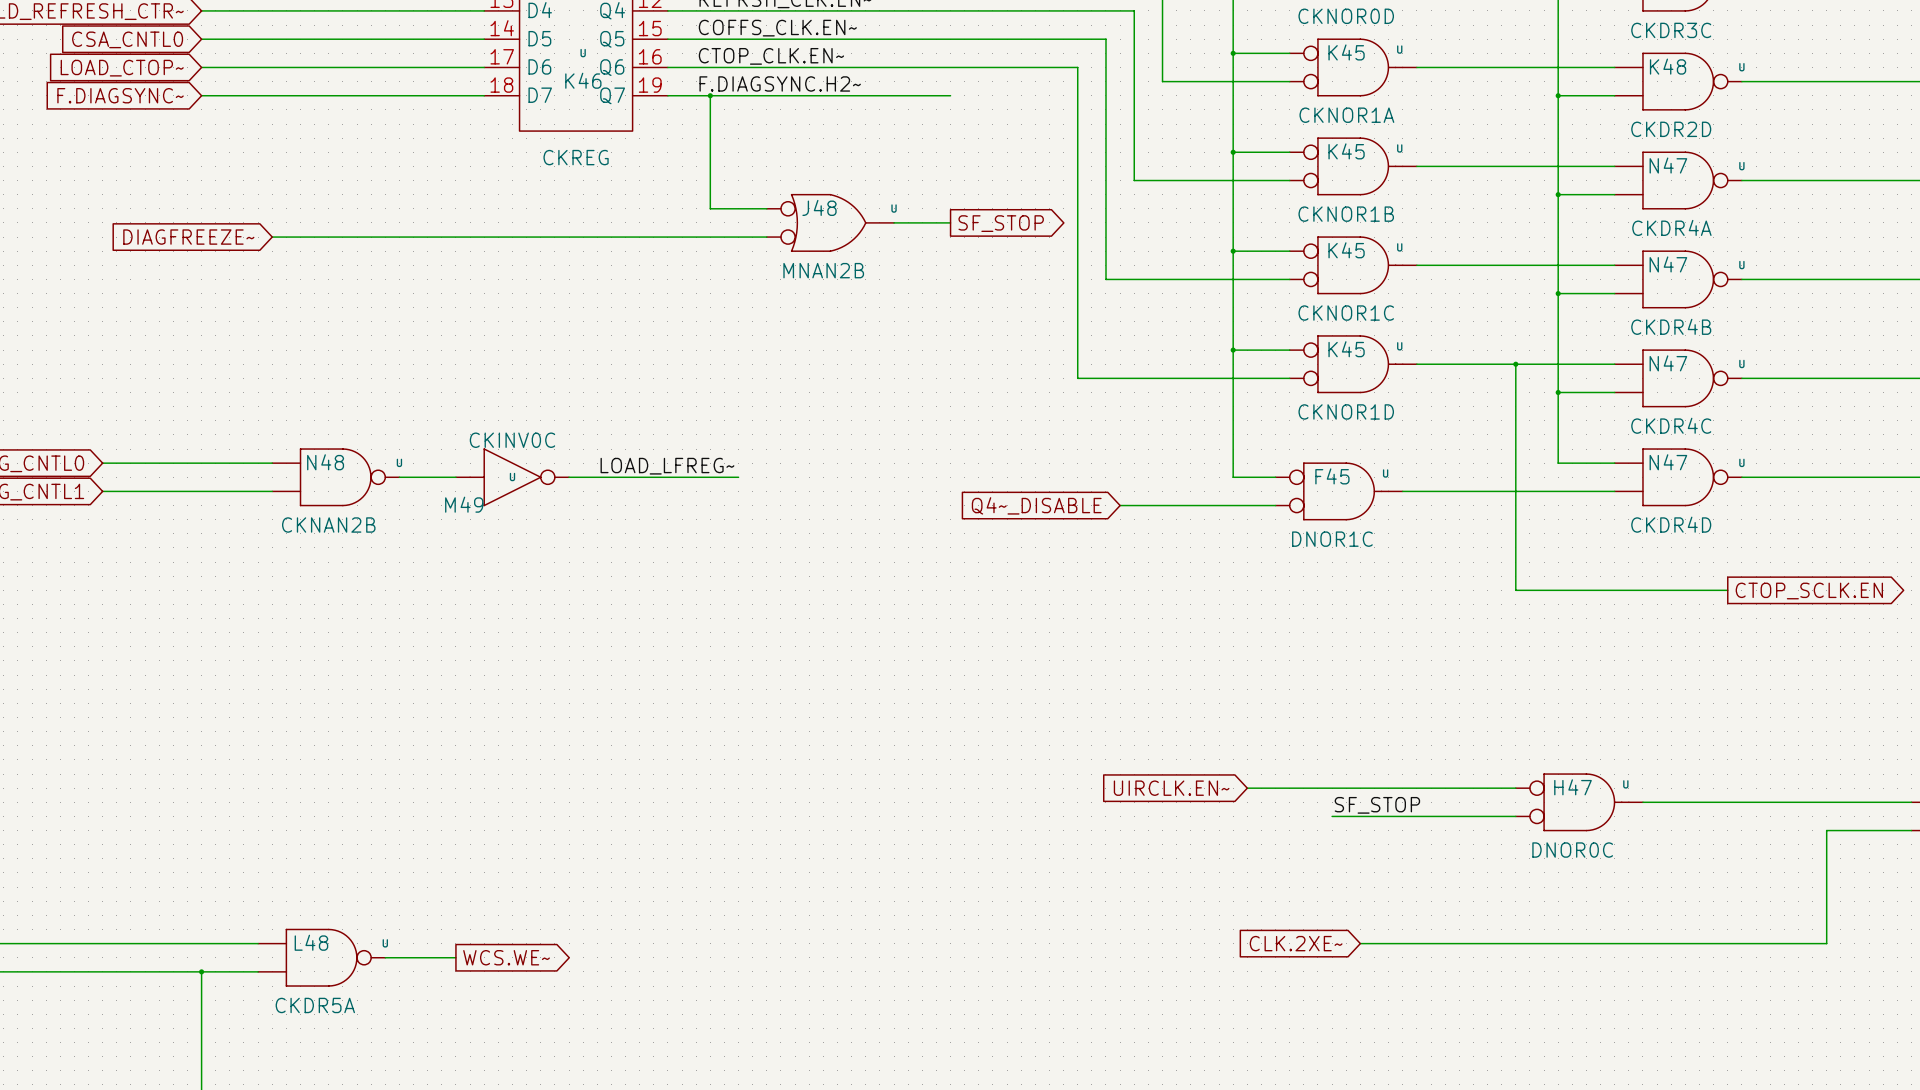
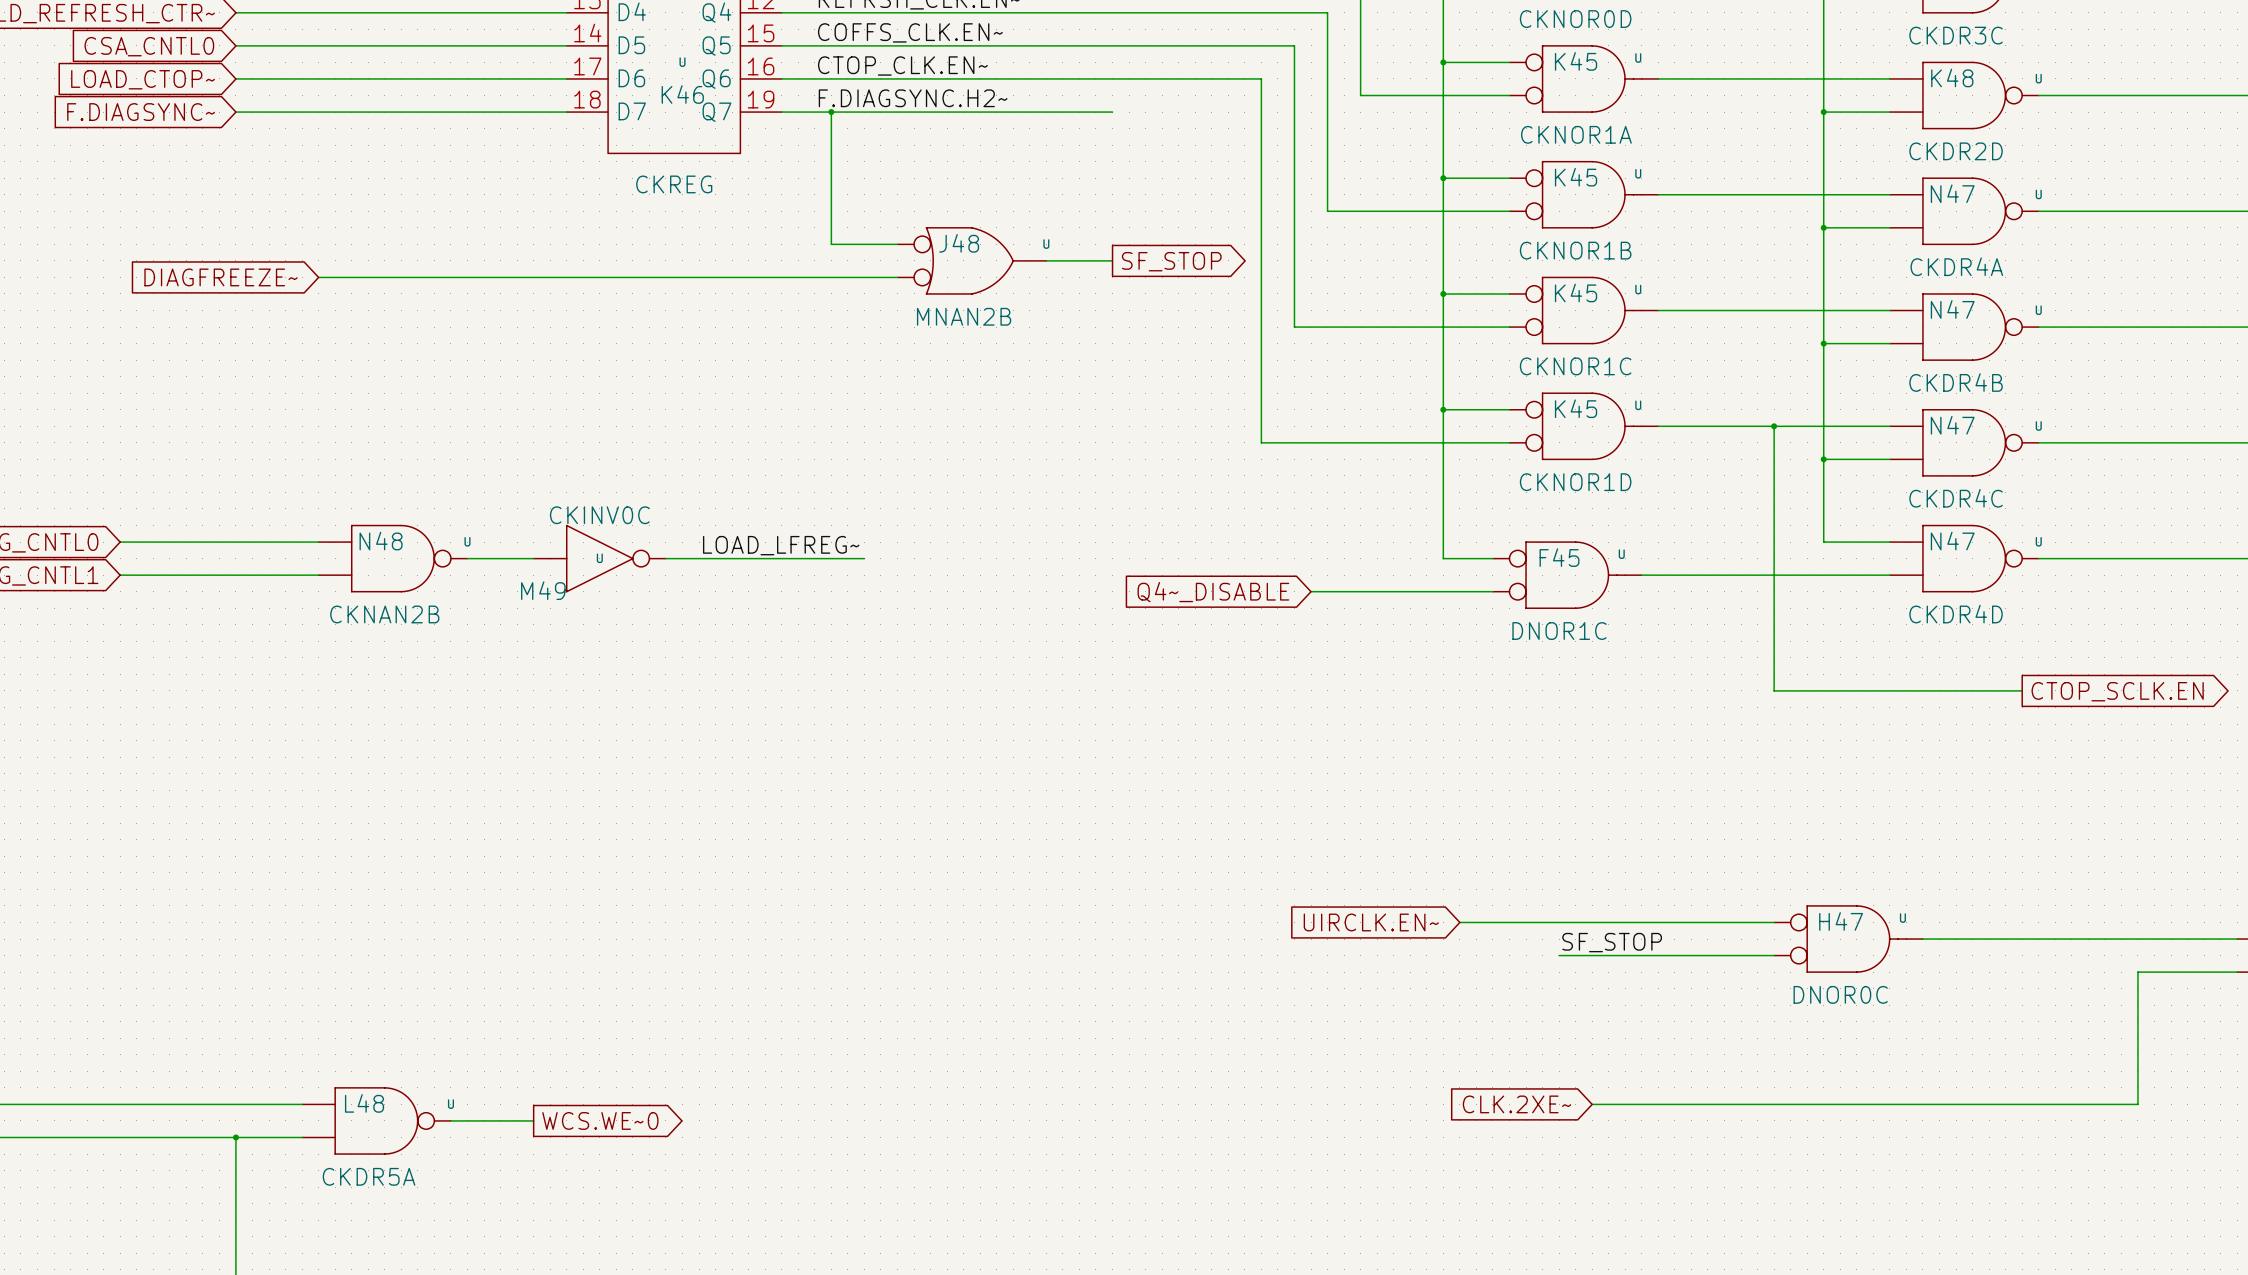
global label: WCS.WE~ (506, 957) -> WCS.WE~0 (600, 1120)

